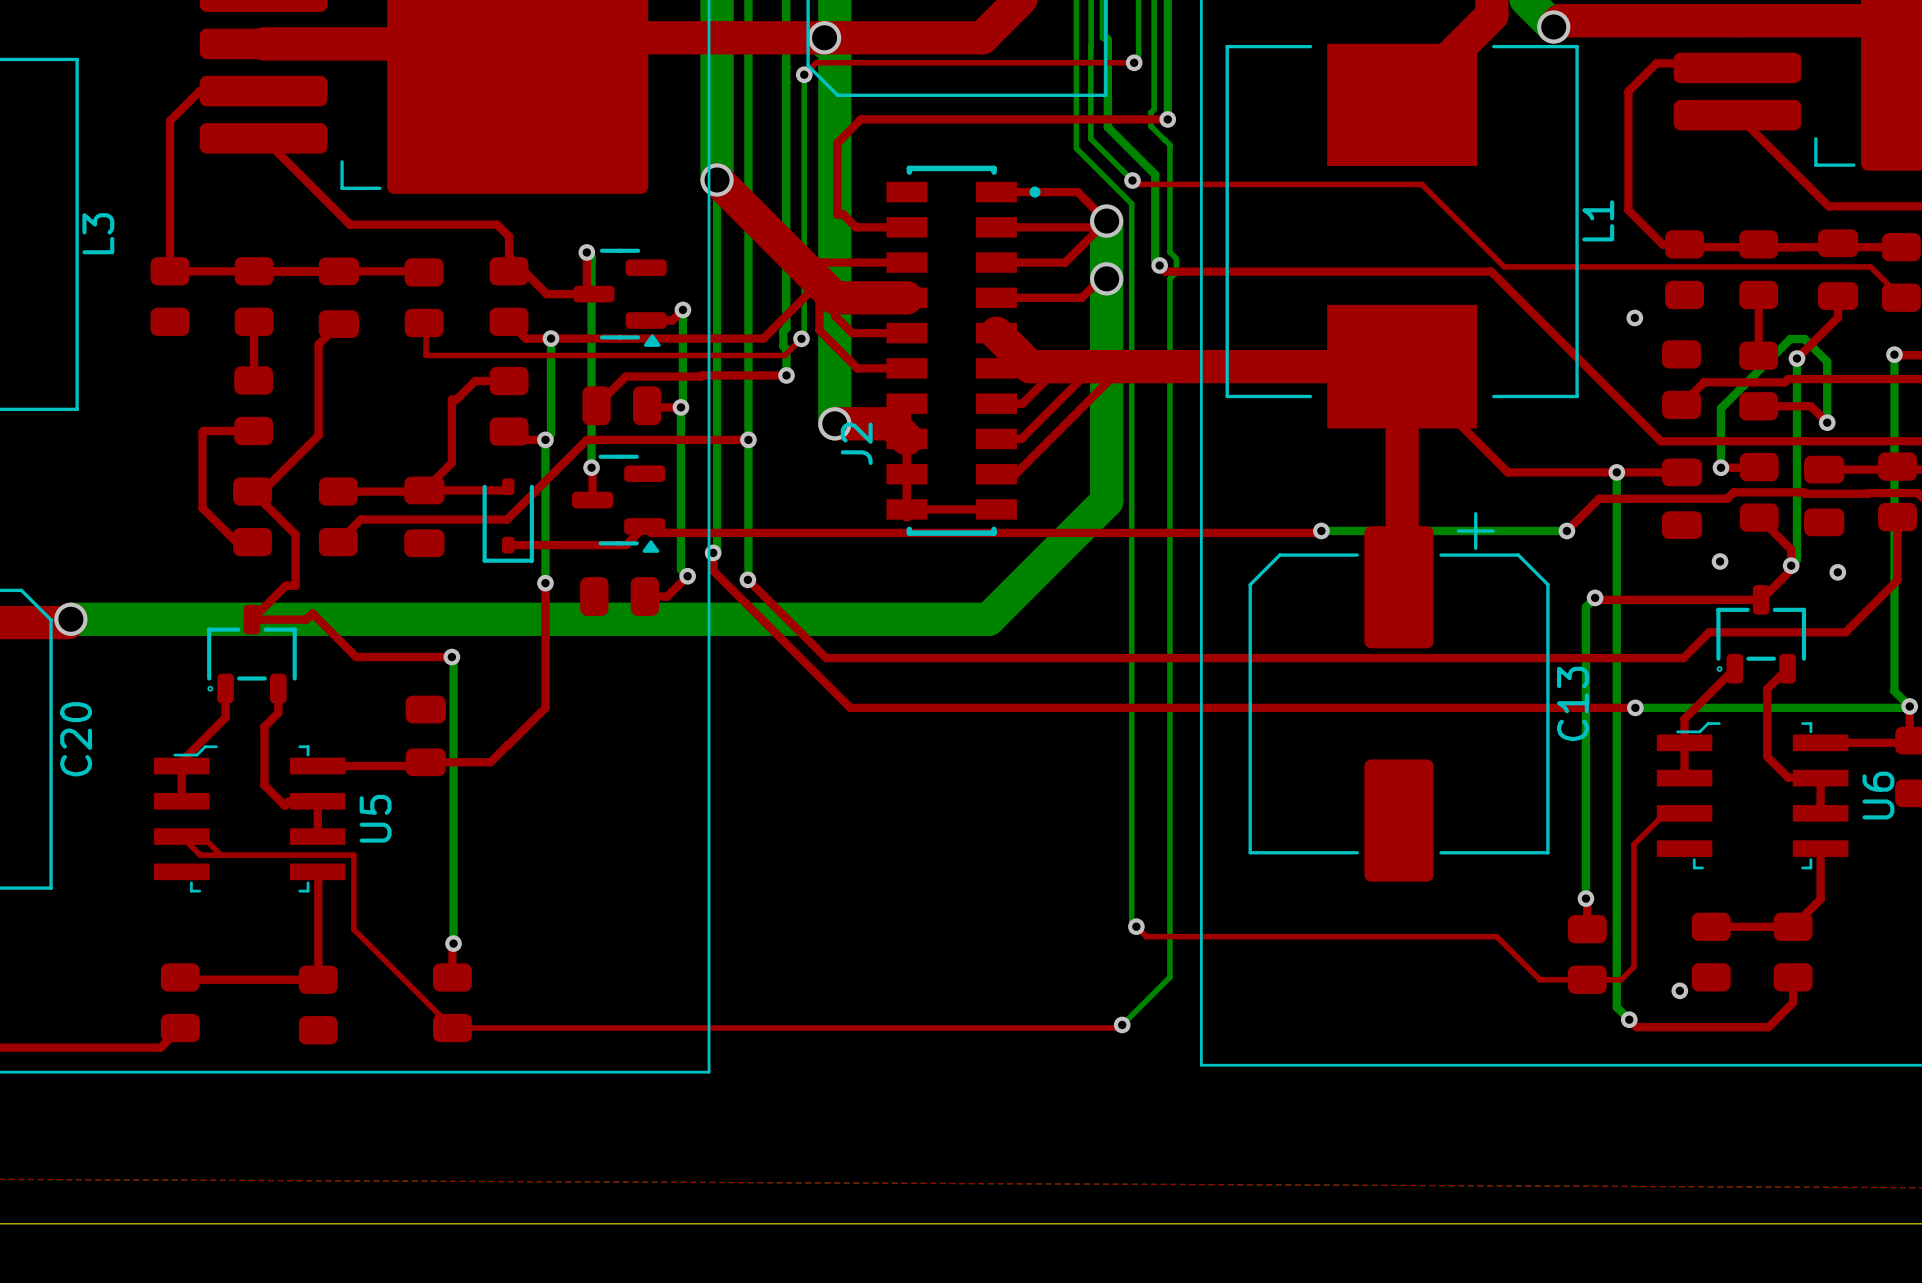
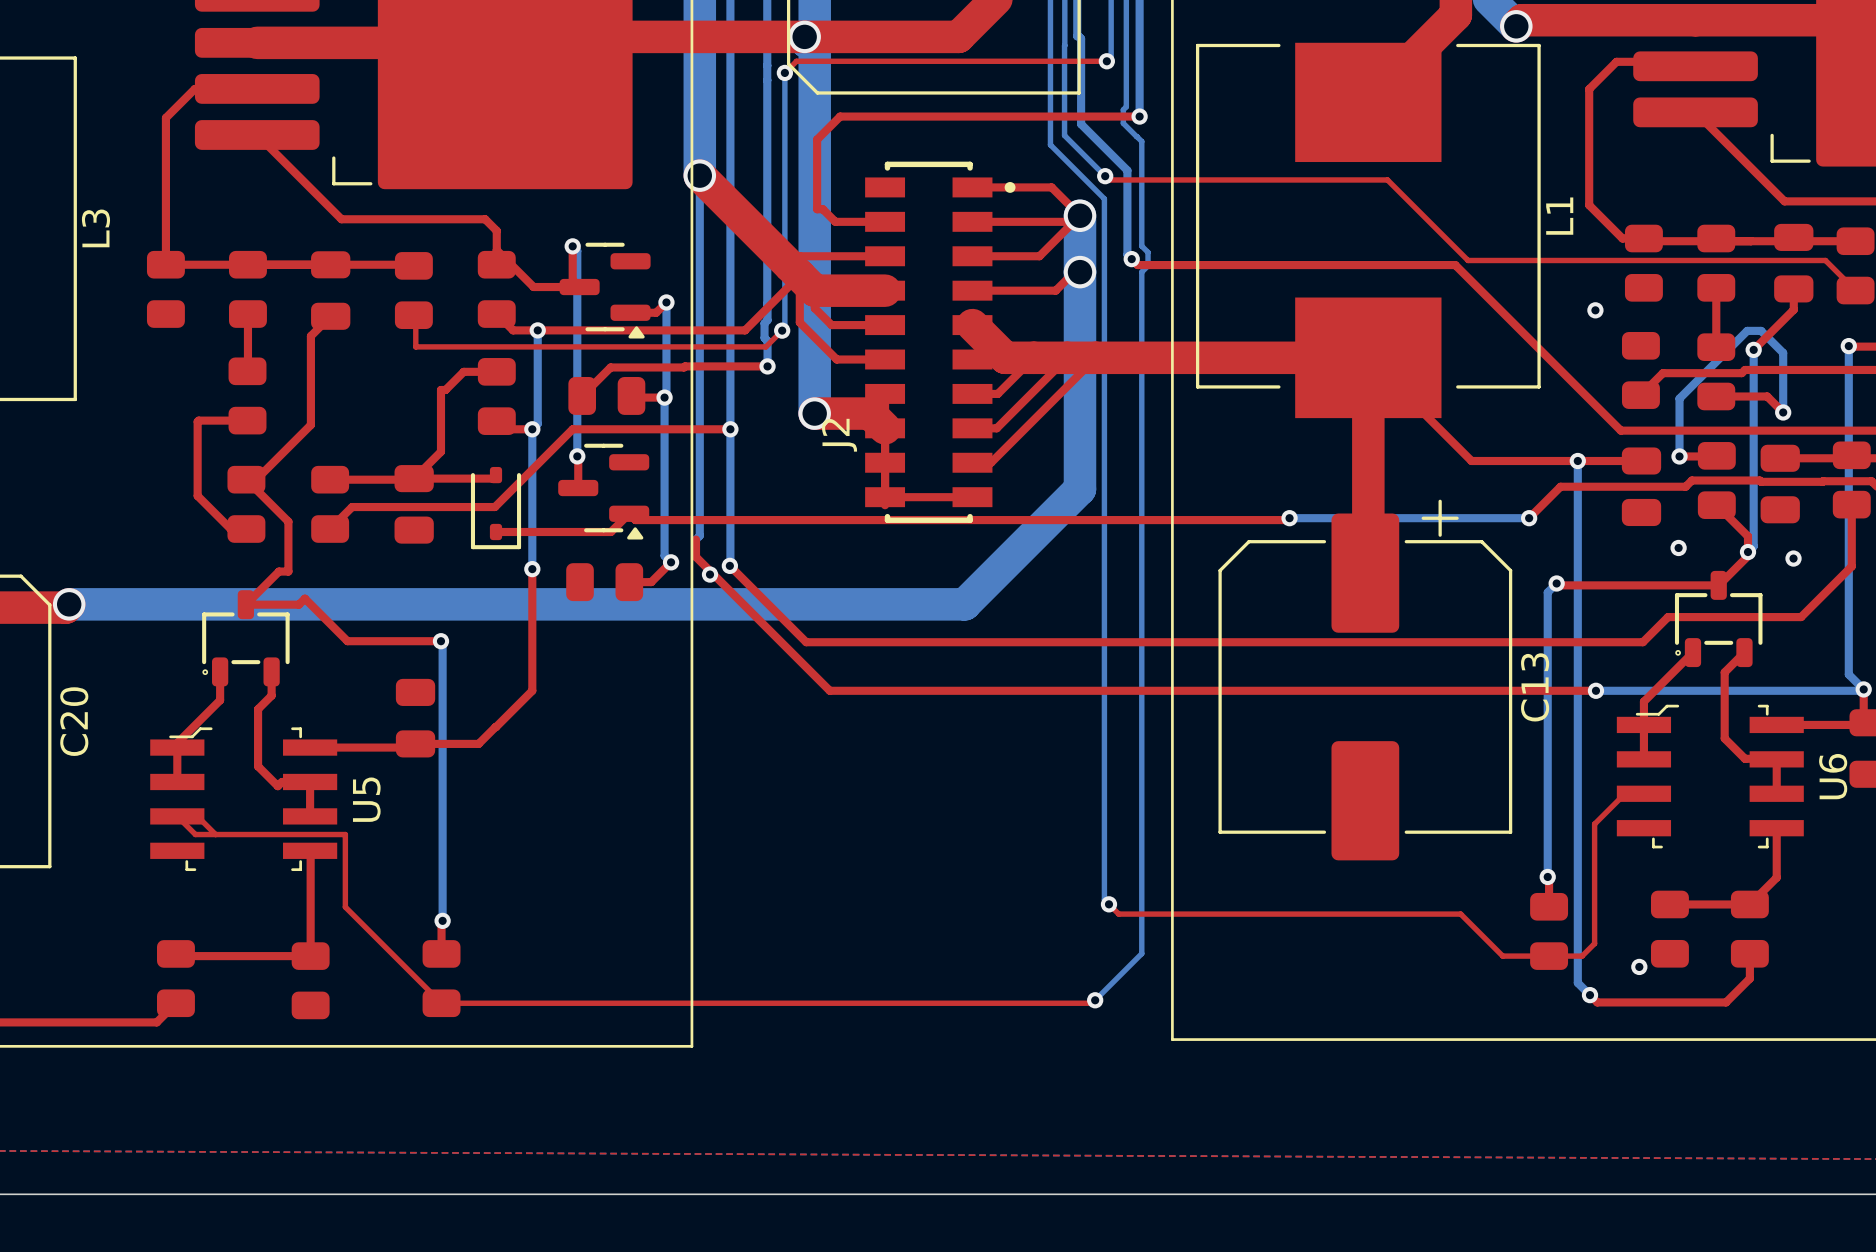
via position: (713, 552) -> (710, 574)

